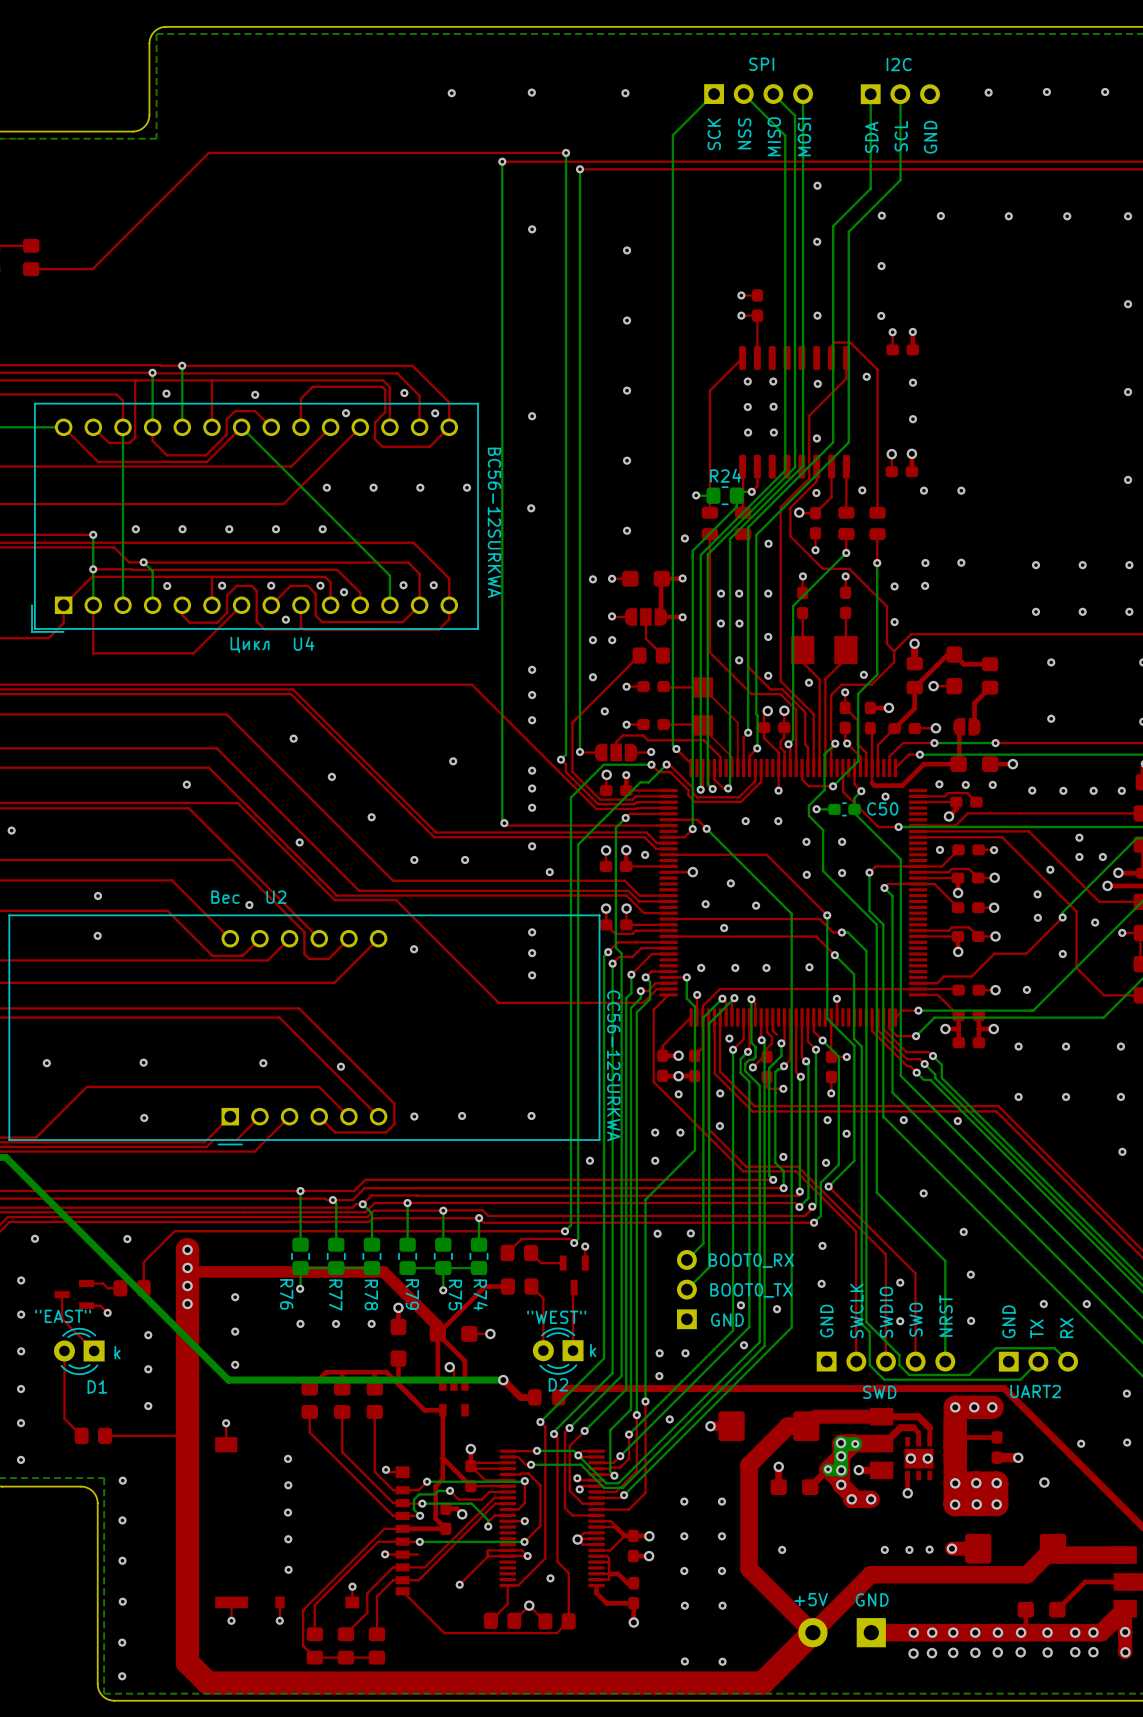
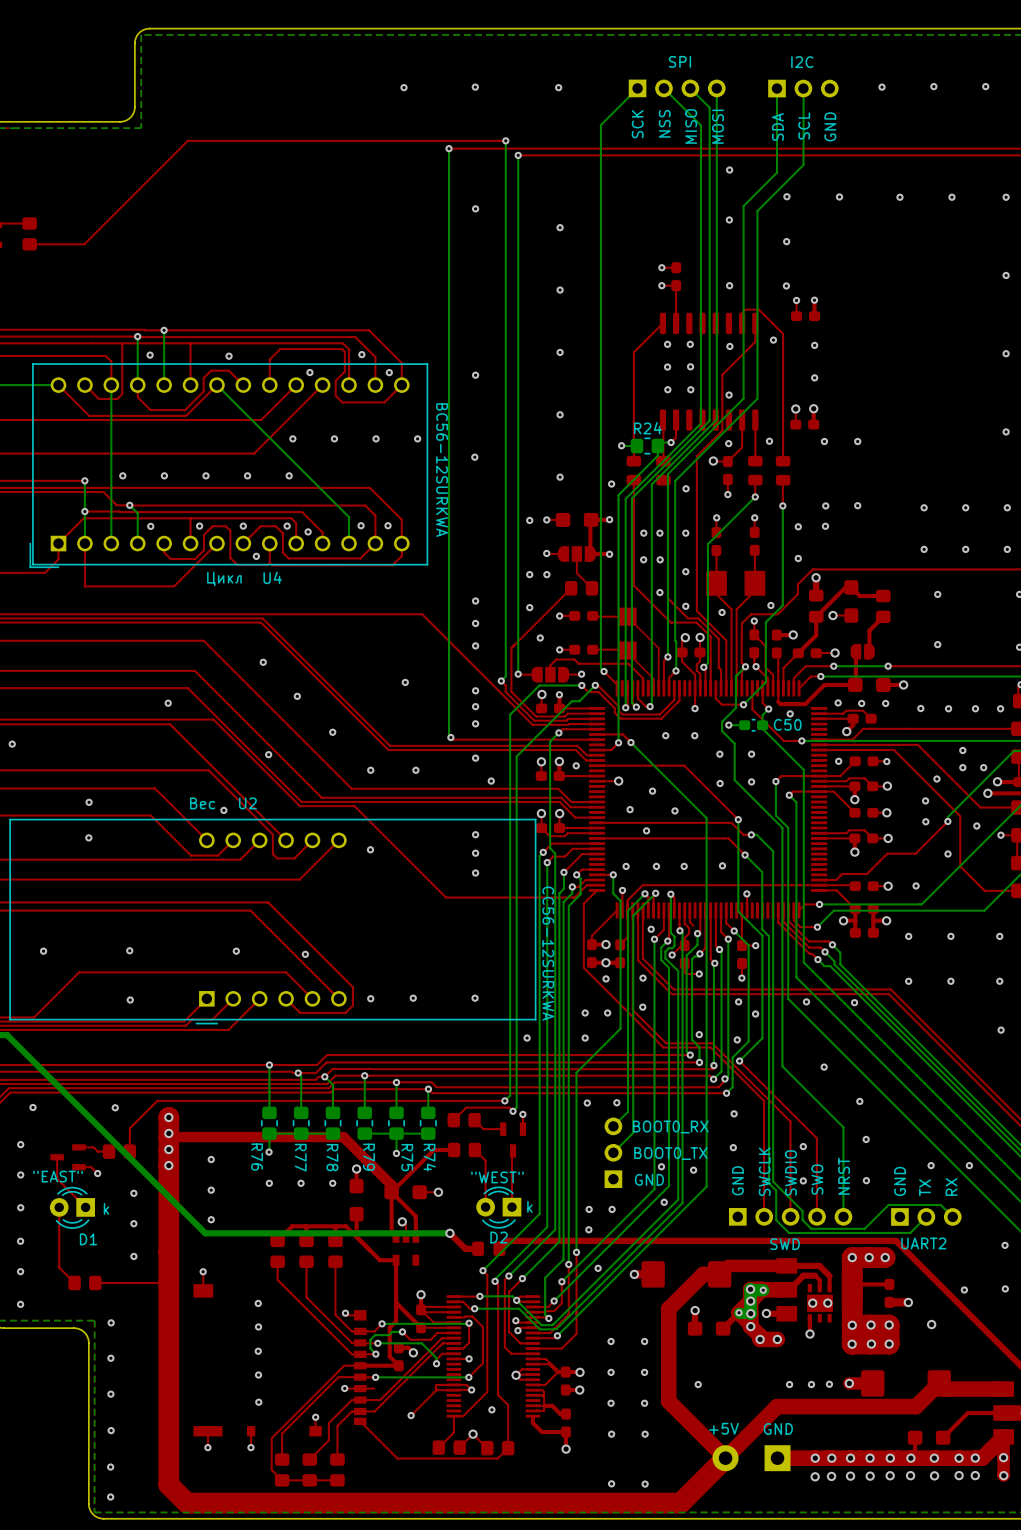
top track: (816, 466) (816, 481) (790, 507) (790, 536) (822, 568) (849, 568) (887, 606) (887, 644) (894, 651) -> none

